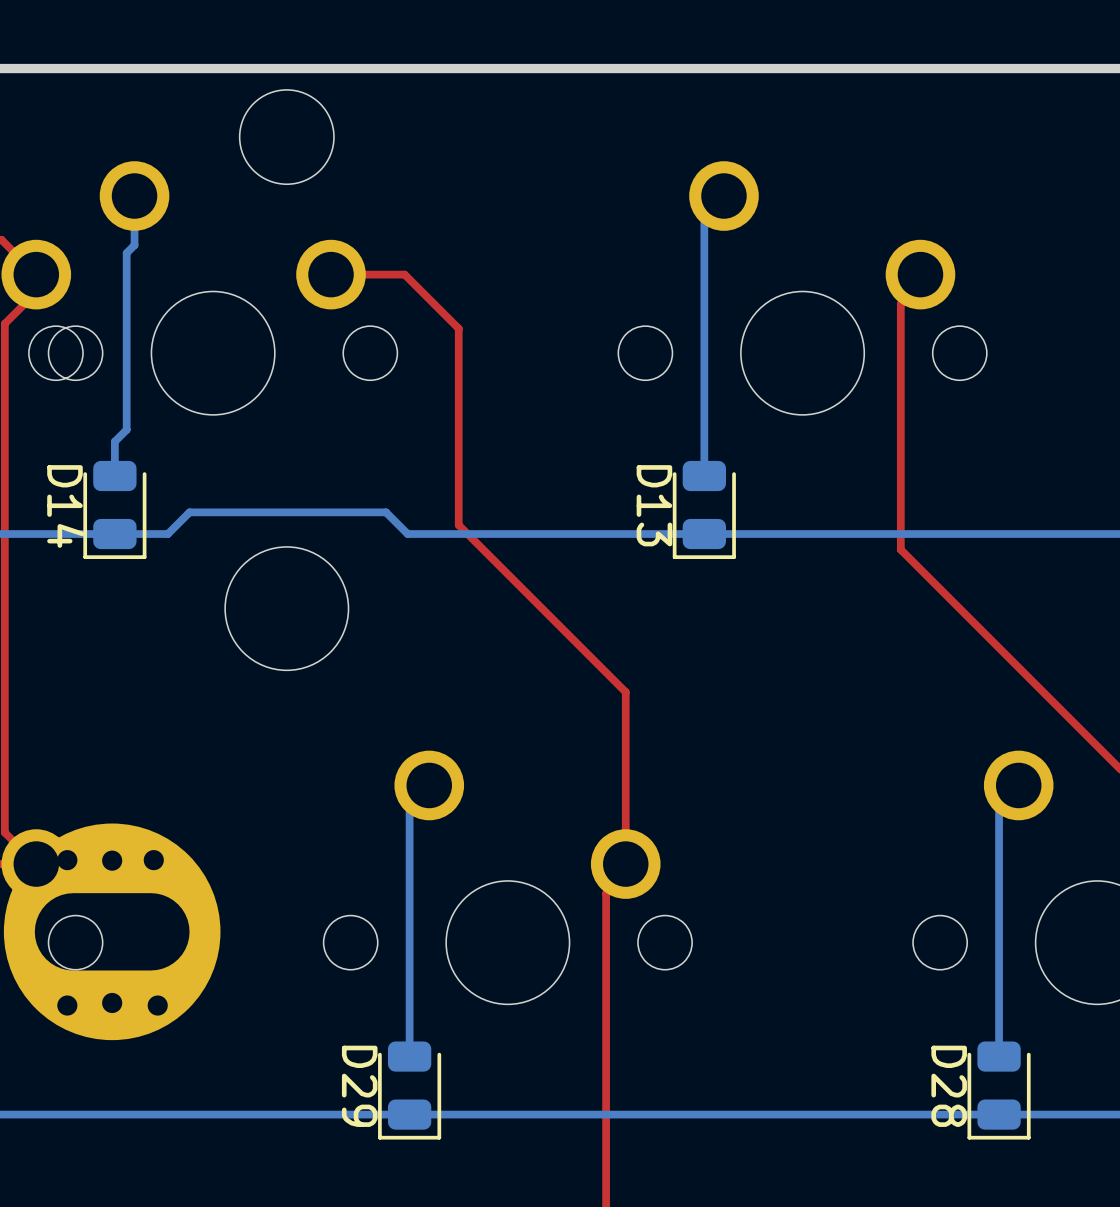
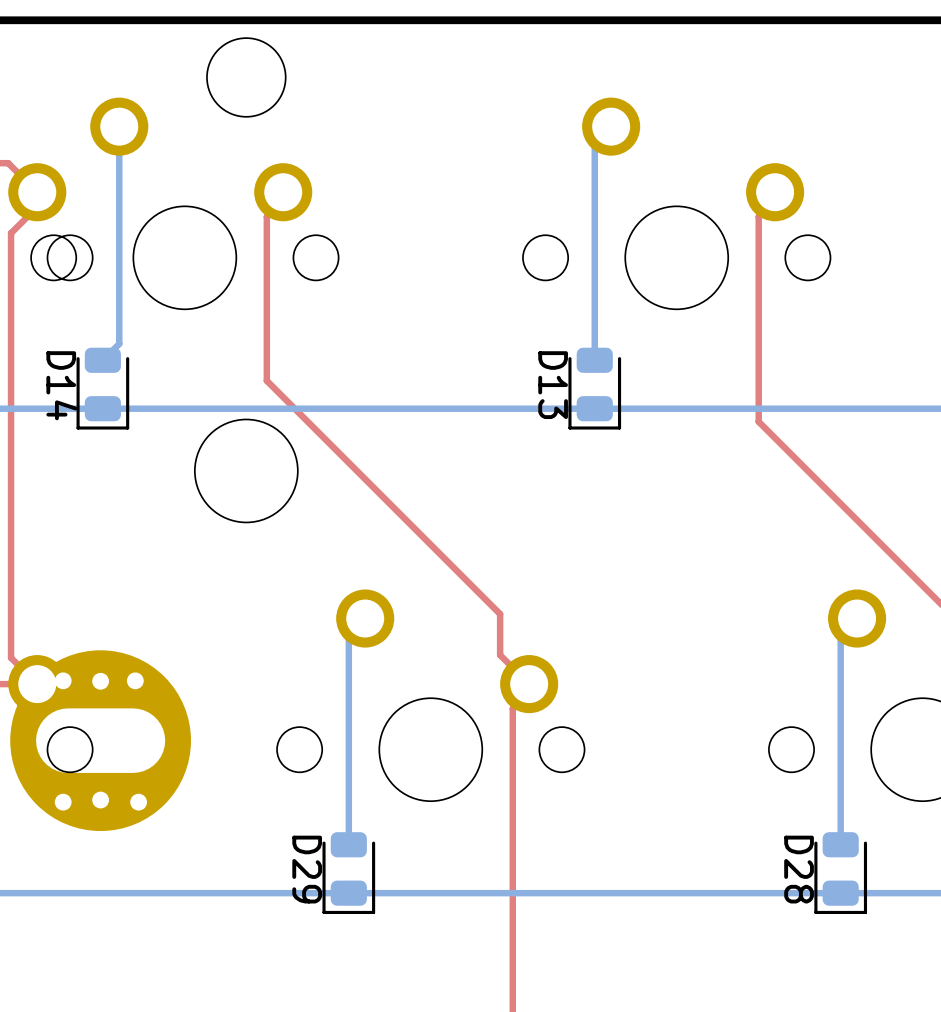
bottom track: (134, 245) (126, 253) (126, 429) (114, 441) (114, 476) -> (119, 167) (119, 343) (102, 360)
top track: (331, 274) (404, 274) (458, 328) (458, 525) (625, 692) (625, 864) -> (283, 192) (283, 200) (266, 216) (266, 380) (500, 614) (500, 655) (529, 684)
bottom track: (407, 534) (386, 512) (189, 512) (167, 534) -> (347, 408) (147, 408)

